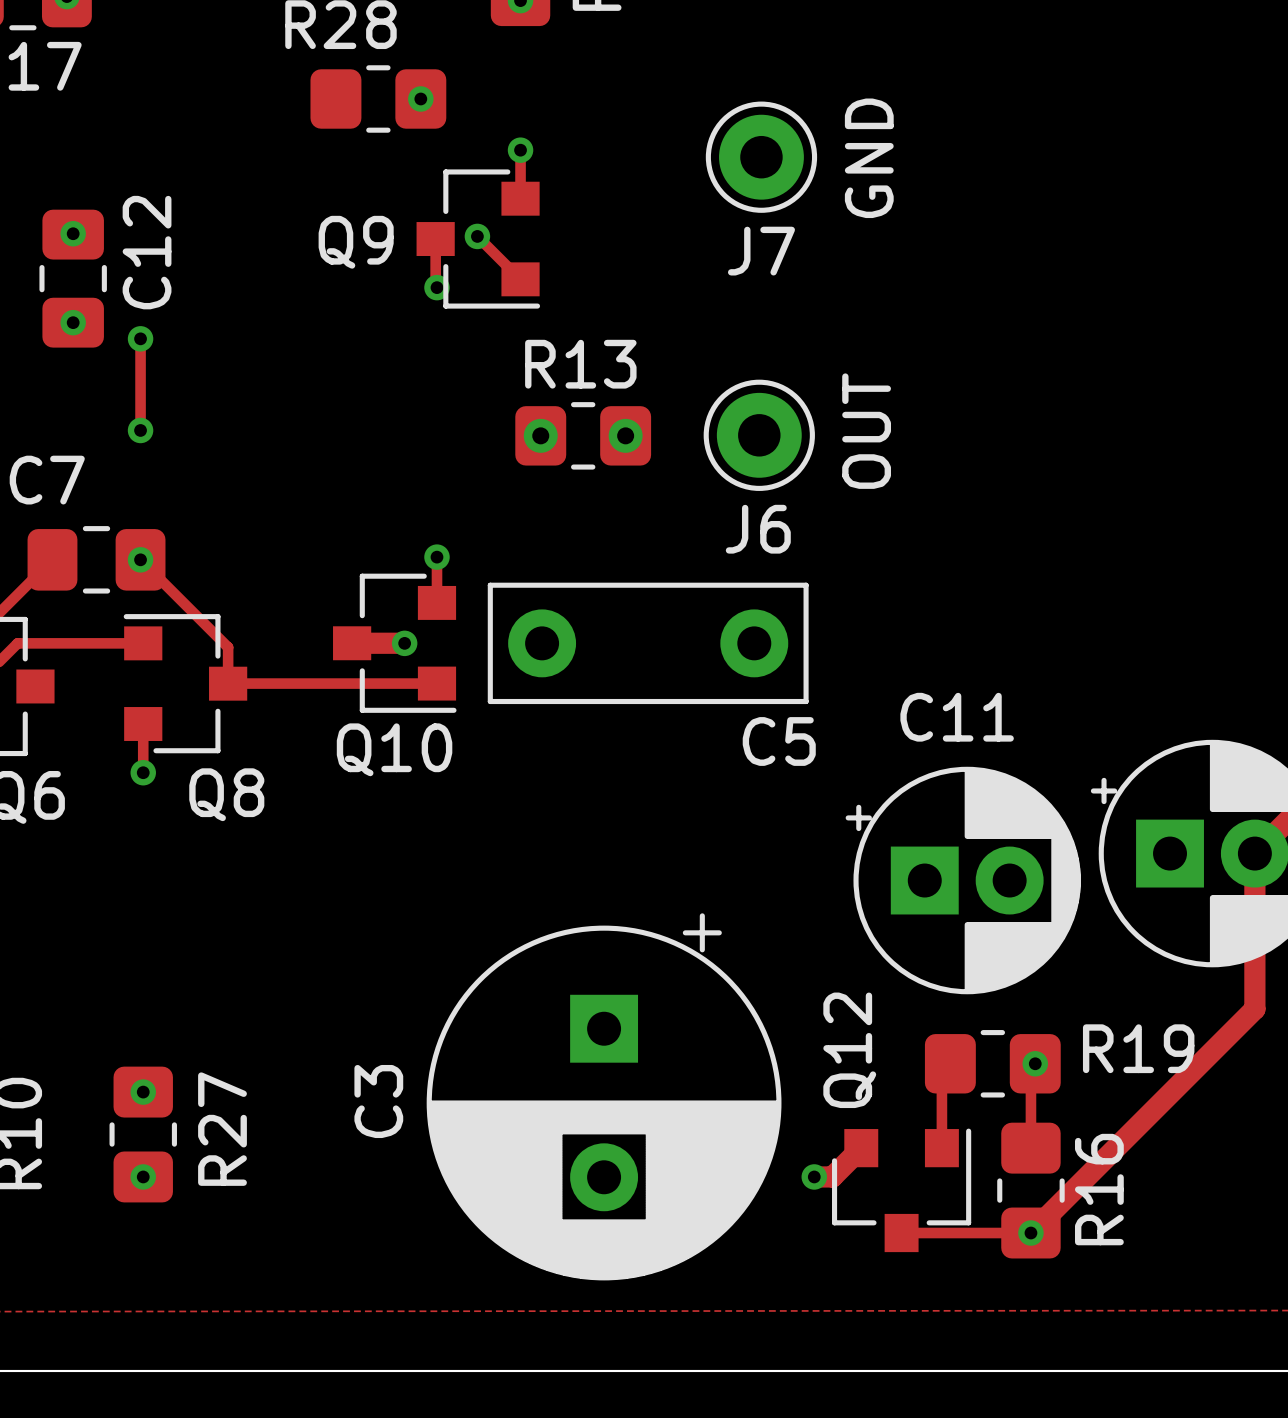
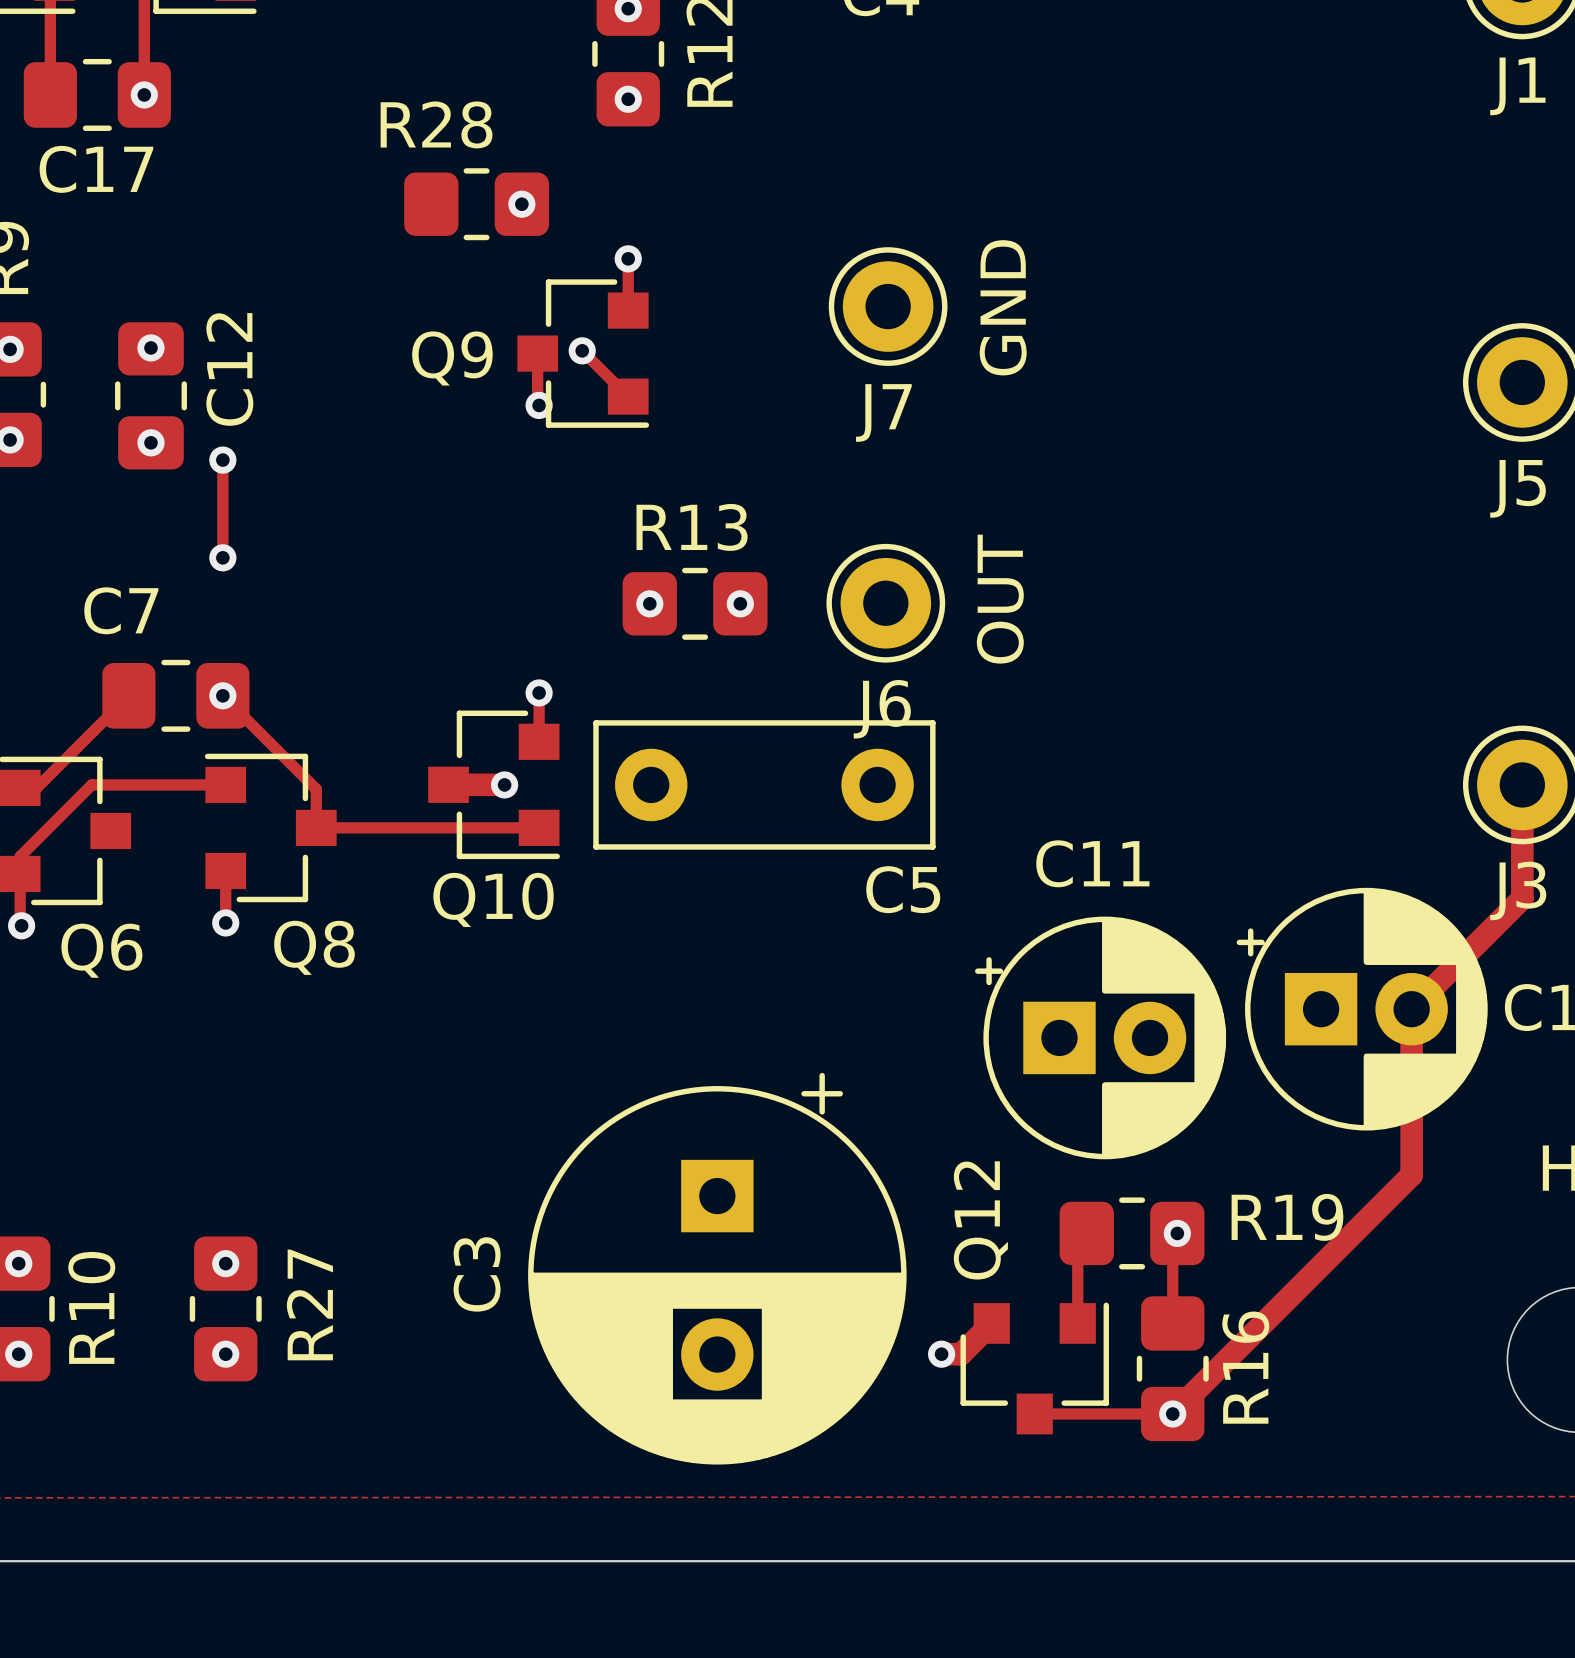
J7 position: (761, 157) -> (888, 306)
text position: GND (869, 158) -> GND (1003, 307)
text position: OUT (866, 431) -> OUT (1000, 599)
via: (540, 435) -> none
R13 position: (583, 435) -> (695, 603)
via: (625, 435) -> none
J6 position: (759, 435) -> (885, 603)
via: none -> (649, 603)
via: none -> (740, 603)

